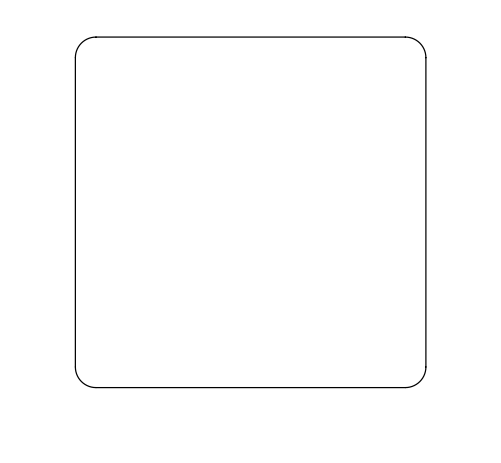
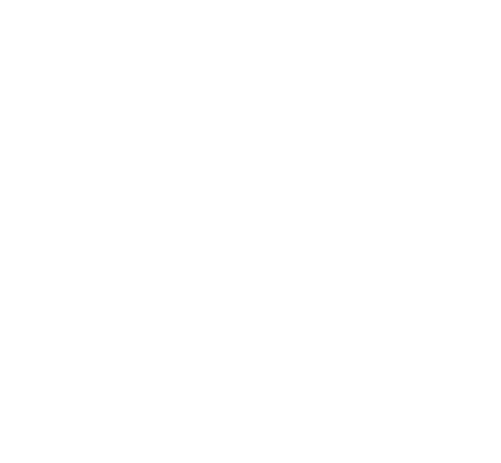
board edge: (95, 37) (405, 37) (412, 38) (419, 43) (423, 48) (425, 57) (425, 366) (423, 375) (419, 381) (414, 385) (405, 387) (95, 387) (89, 386) (81, 381) (77, 375) (75, 366) (75, 57) (77, 48) (81, 43) (89, 38) (95, 37) -> none

